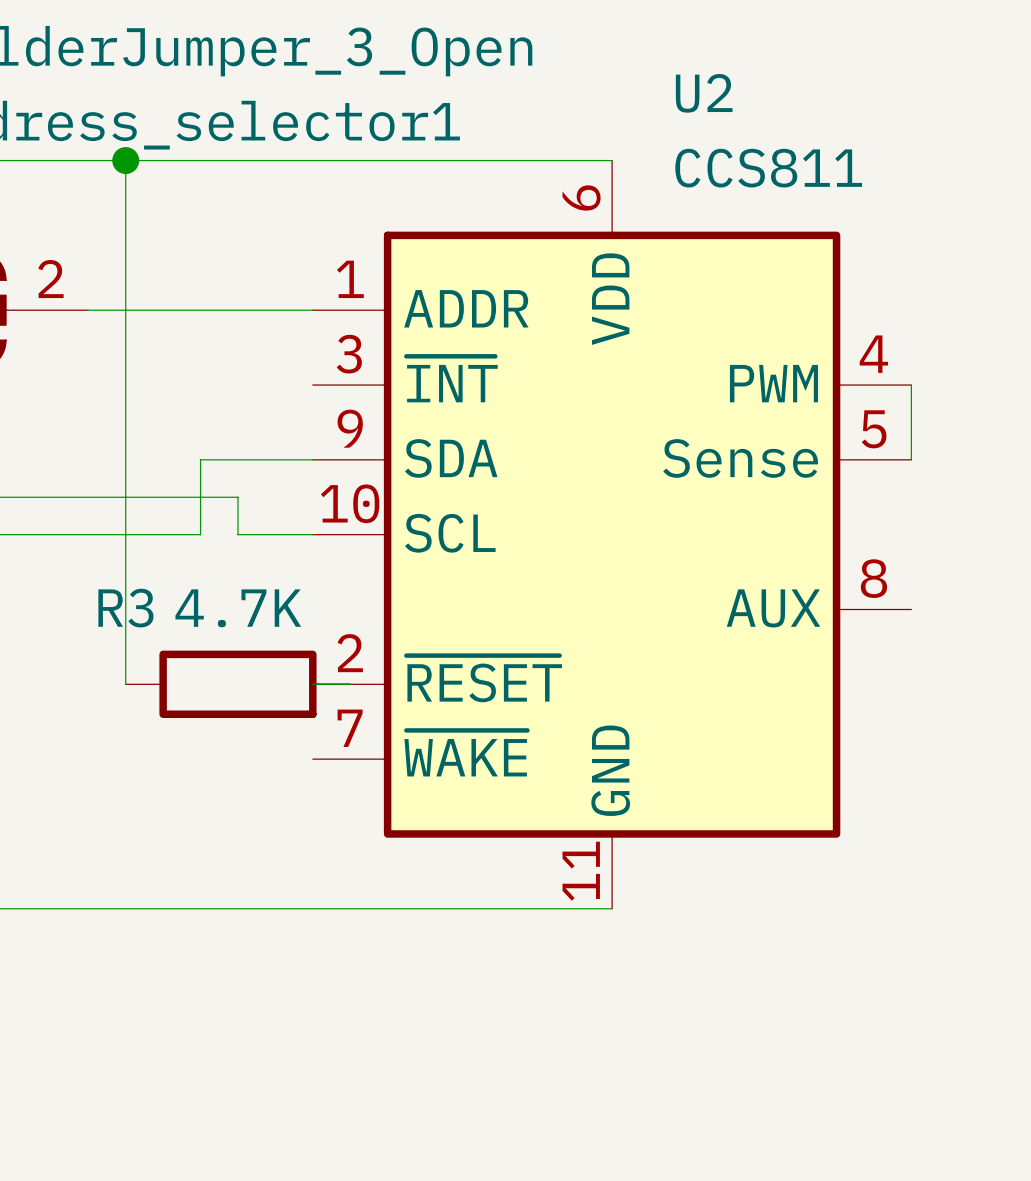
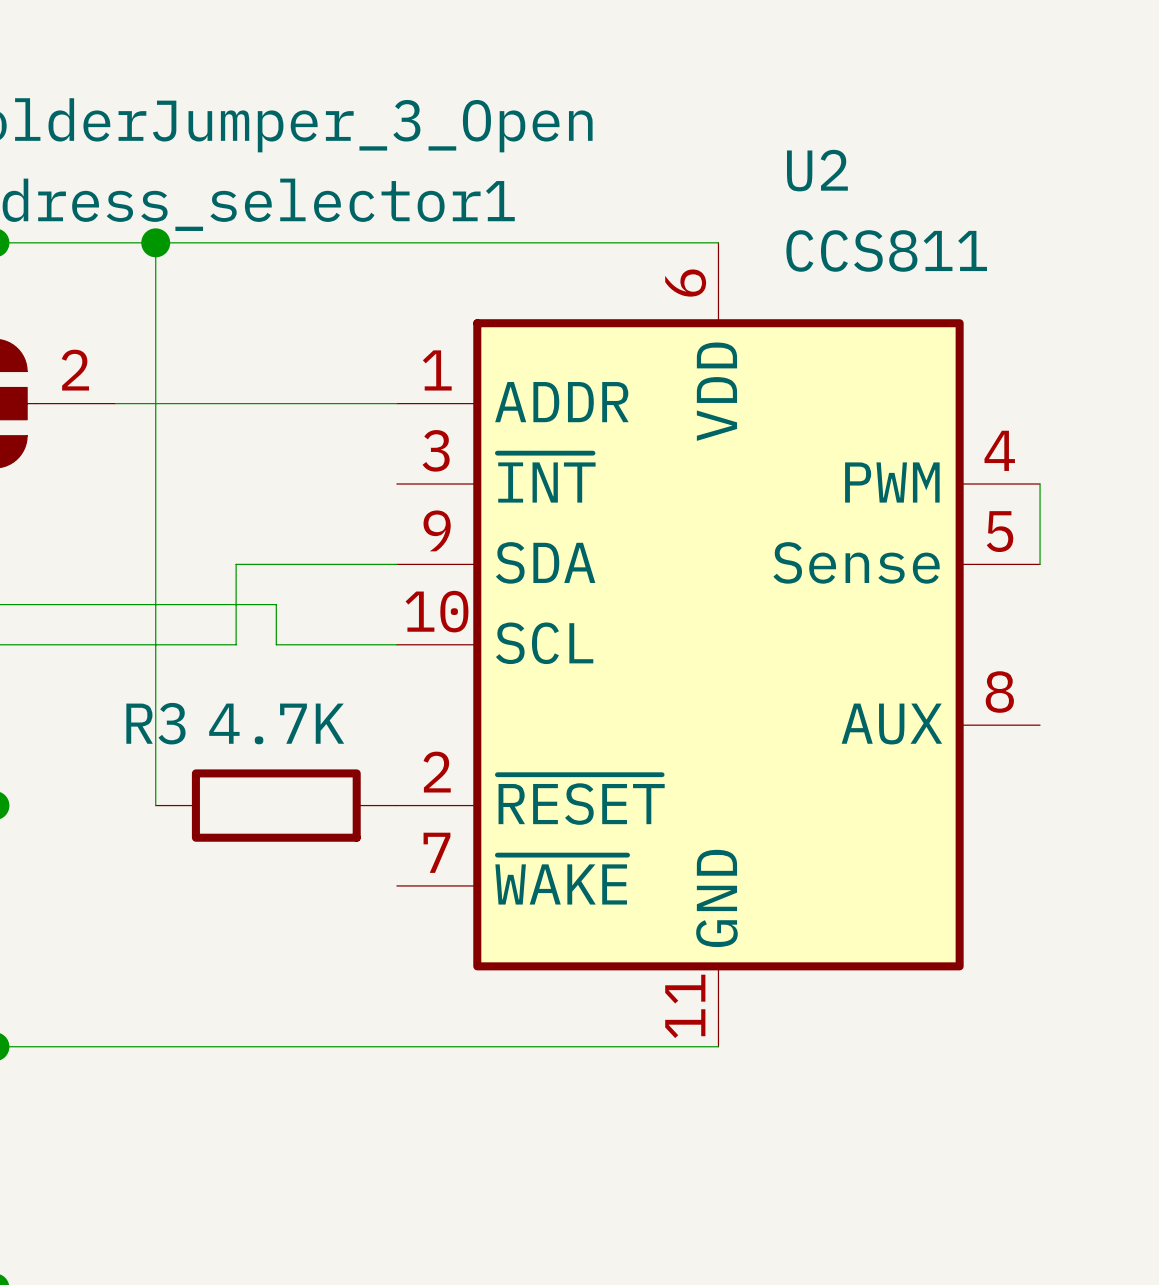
wire: none -> (678, 242) (718, 242)
wire: (911, 385) (911, 459) -> (1040, 484) (1040, 564)
U2 position: (612, 534) -> (718, 644)
wire: none -> (678, 1046) (718, 1046)

